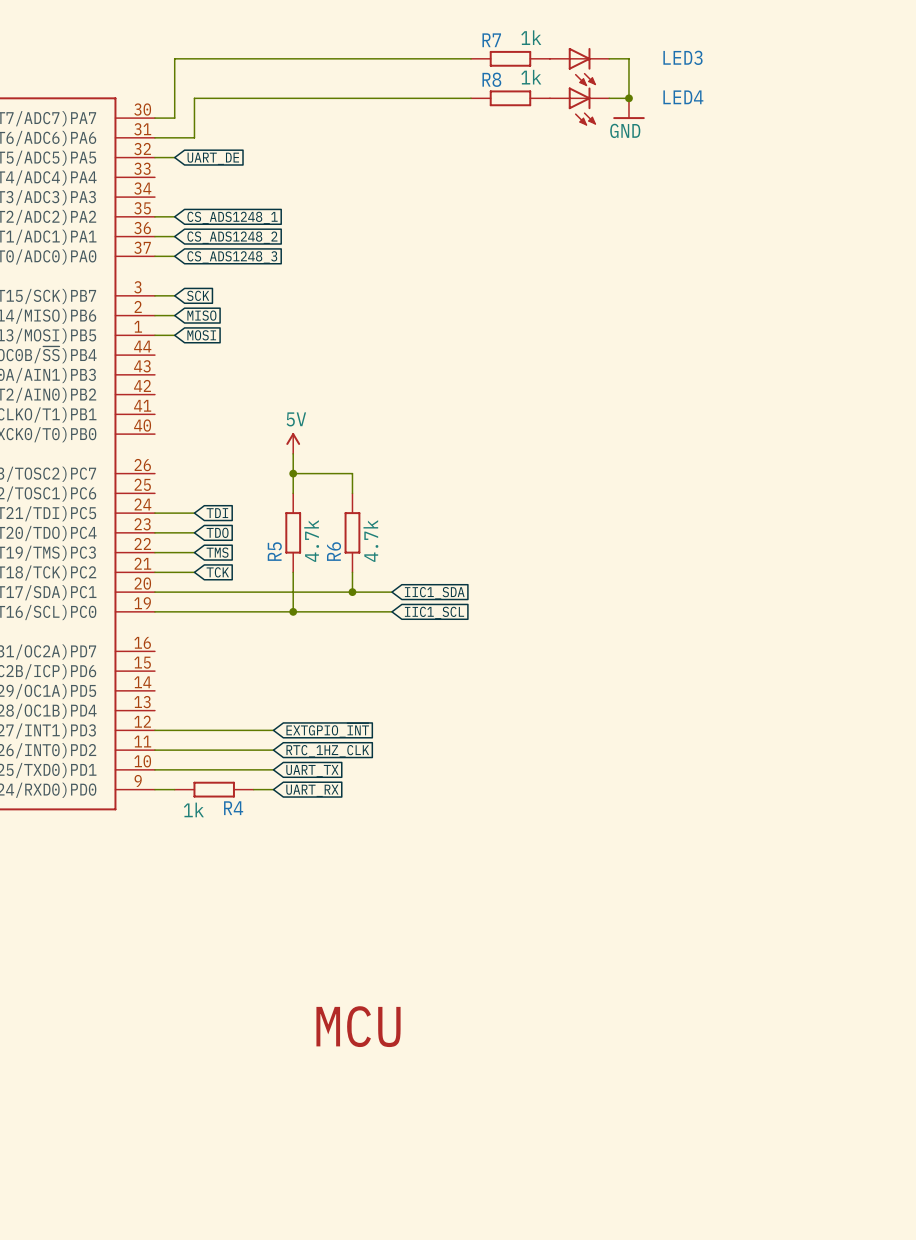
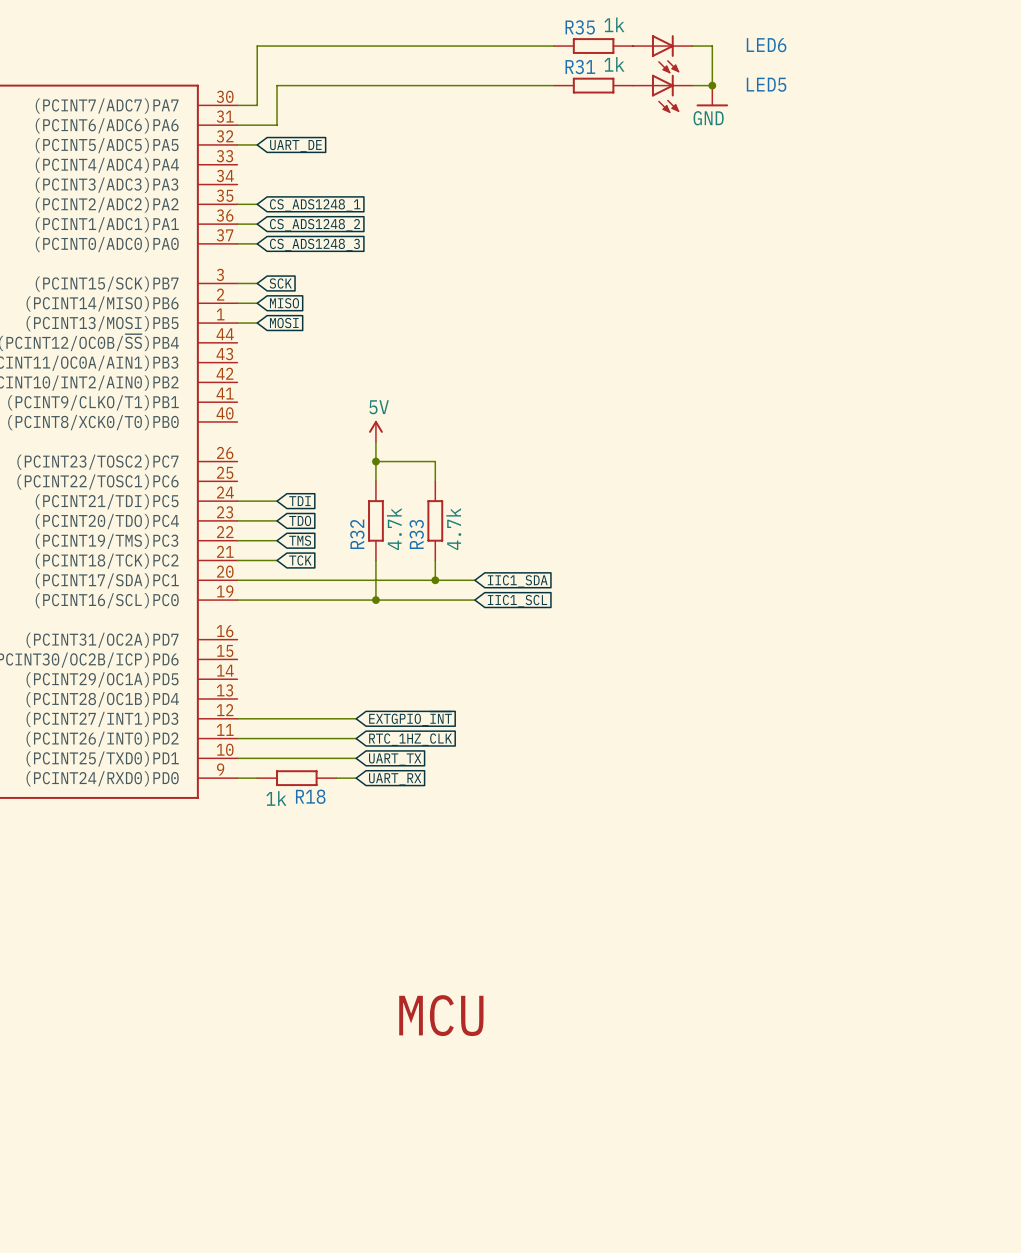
R7 name: R7 (491, 40) -> R35 (580, 27)
LED3 name: LED3 (682, 57) -> LED6 (766, 45)
R8 name: R8 (491, 79) -> R31 (580, 67)
LED4 name: LED4 (683, 97) -> LED5 (766, 84)
R5 name: R5 (274, 551) -> R32 (357, 534)
R6 name: R6 (334, 551) -> R33 (416, 534)
R4 name: R4 (233, 808) -> R18 (310, 796)

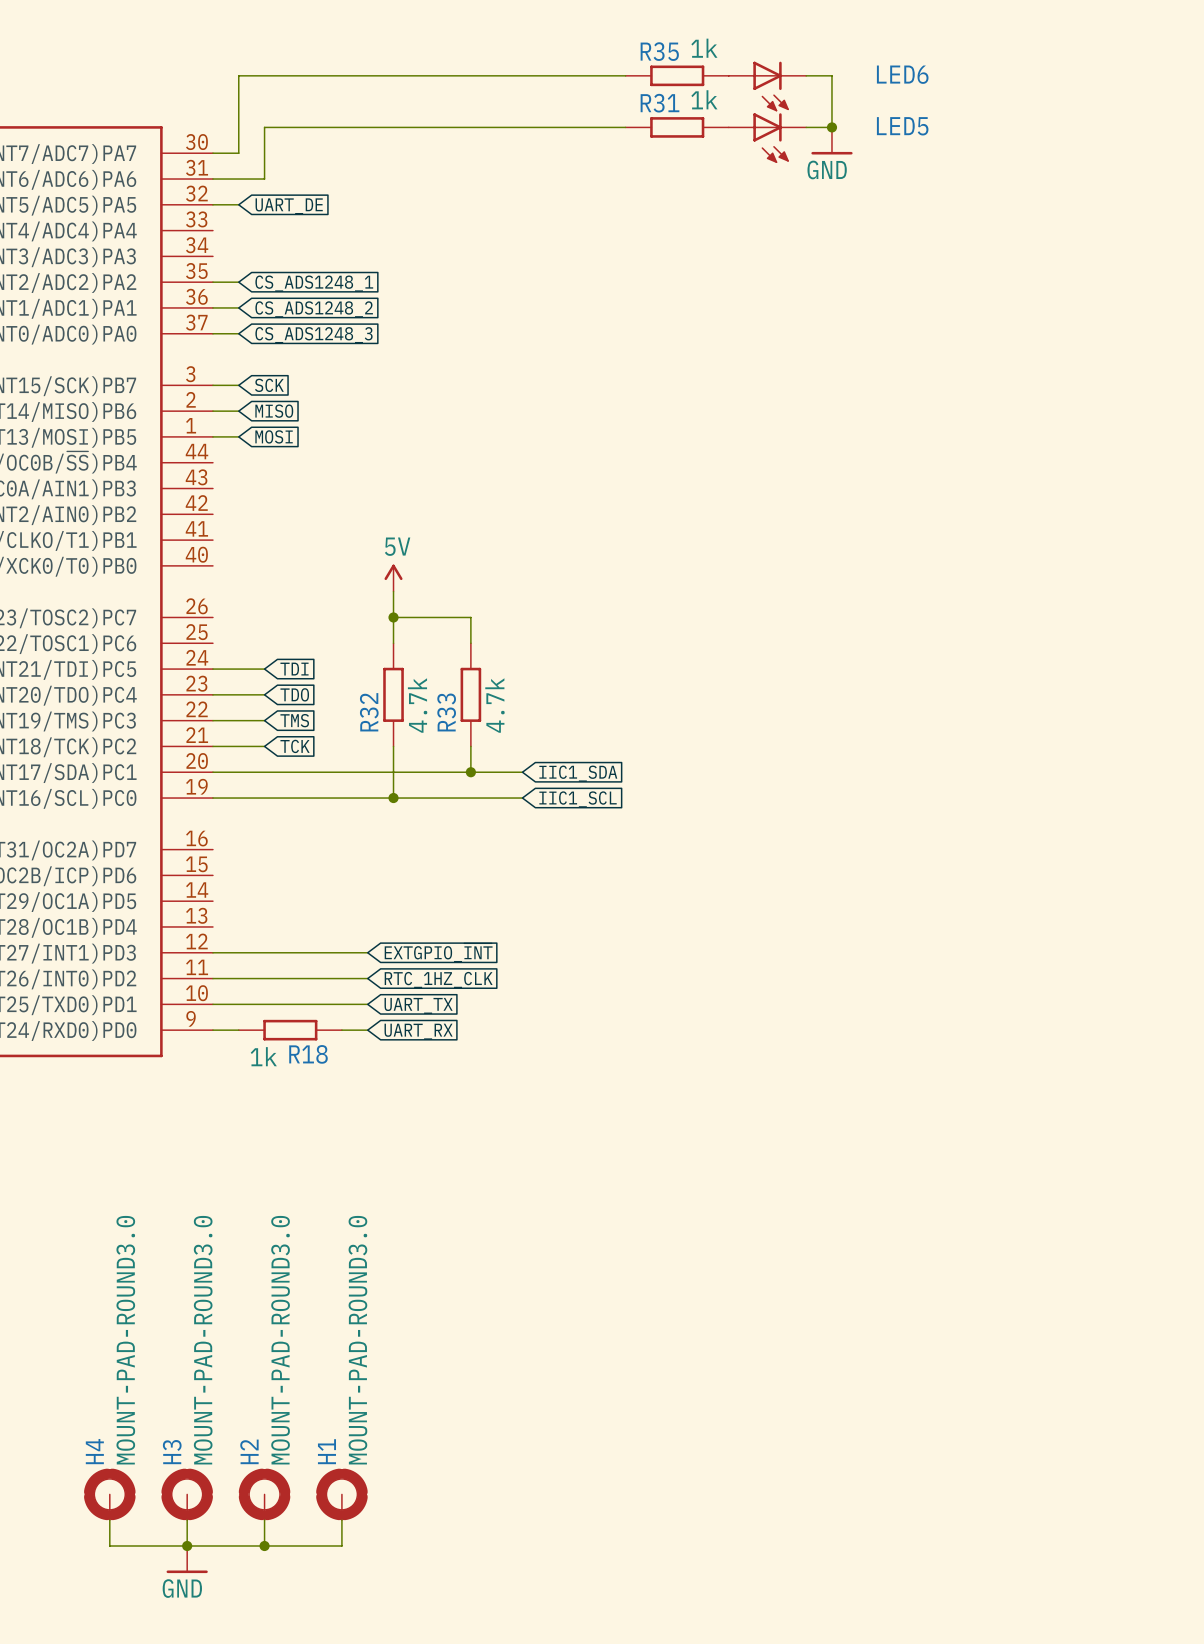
text: MCU (441, 1015) -> none
H4: none -> MOUNT-PAD-ROUND3.0 (109, 1494)
H3: none -> MOUNT-PAD-ROUND3.0 (187, 1494)
H2: none -> MOUNT-PAD-ROUND3.0 (264, 1494)
H1: none -> MOUNT-PAD-ROUND3.0 (341, 1494)
wire: none -> (109, 1520) (109, 1545) (341, 1545) (341, 1520)
wire: none -> (187, 1520) (187, 1545)
wire: none -> (264, 1520) (264, 1545)
junction: none -> (187, 1545)
junction: none -> (264, 1545)
power symbol: none -> GND (187, 1559)

